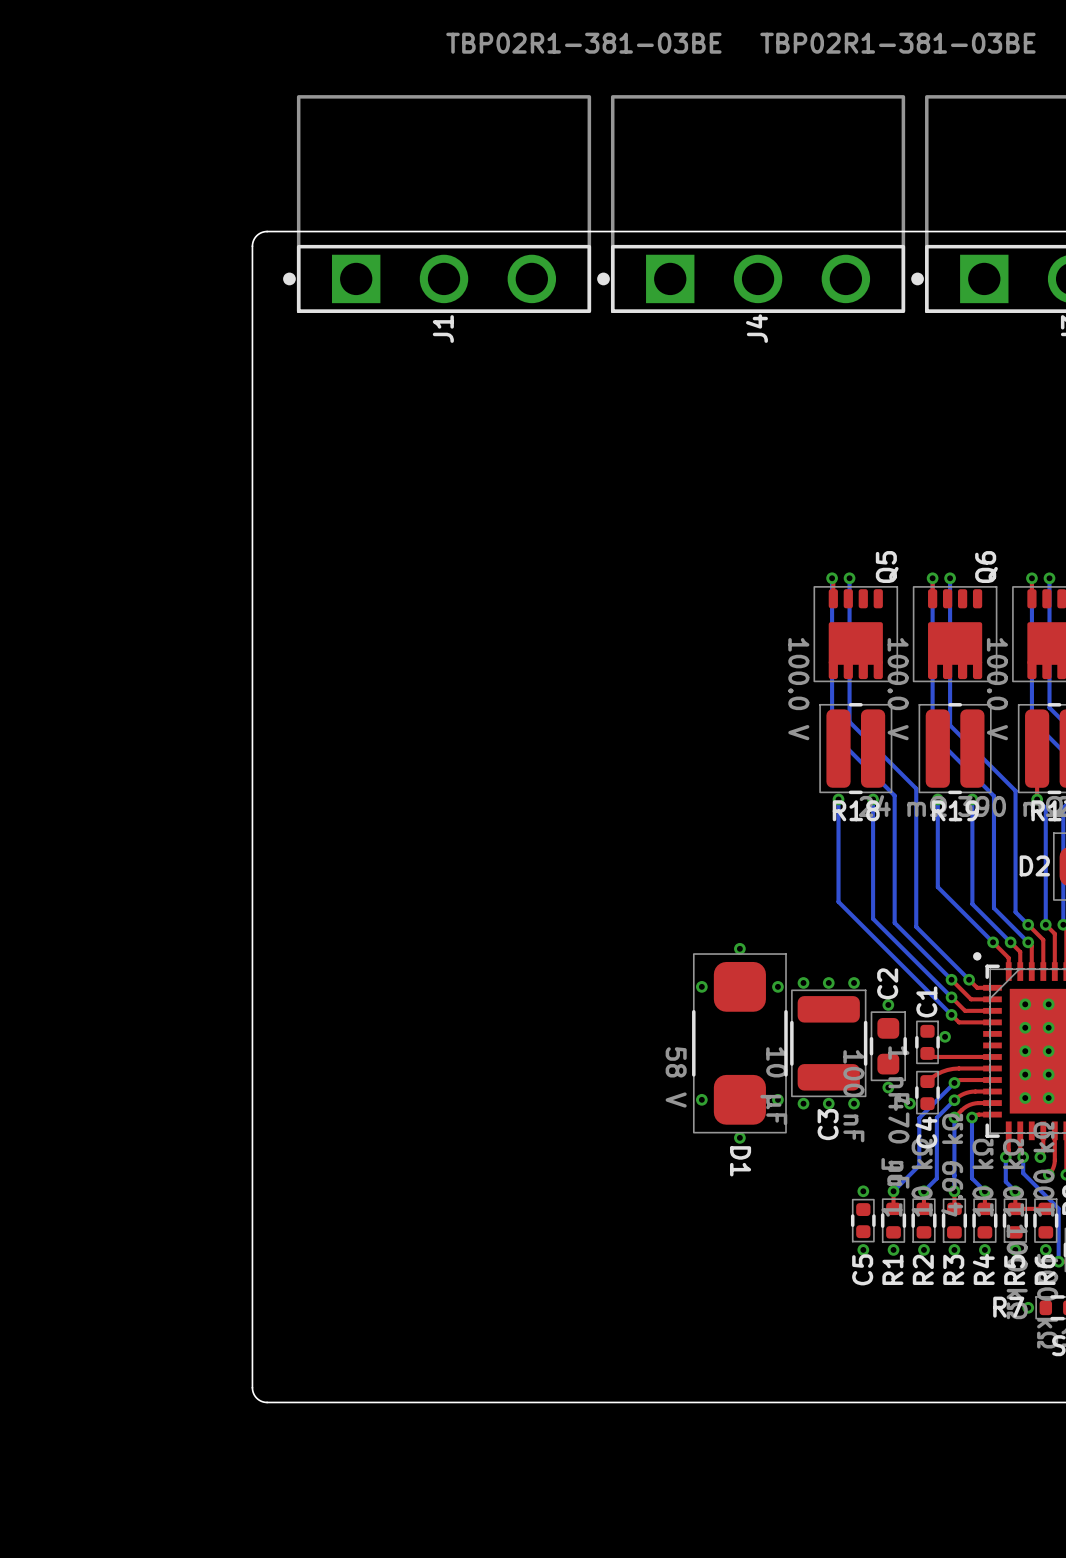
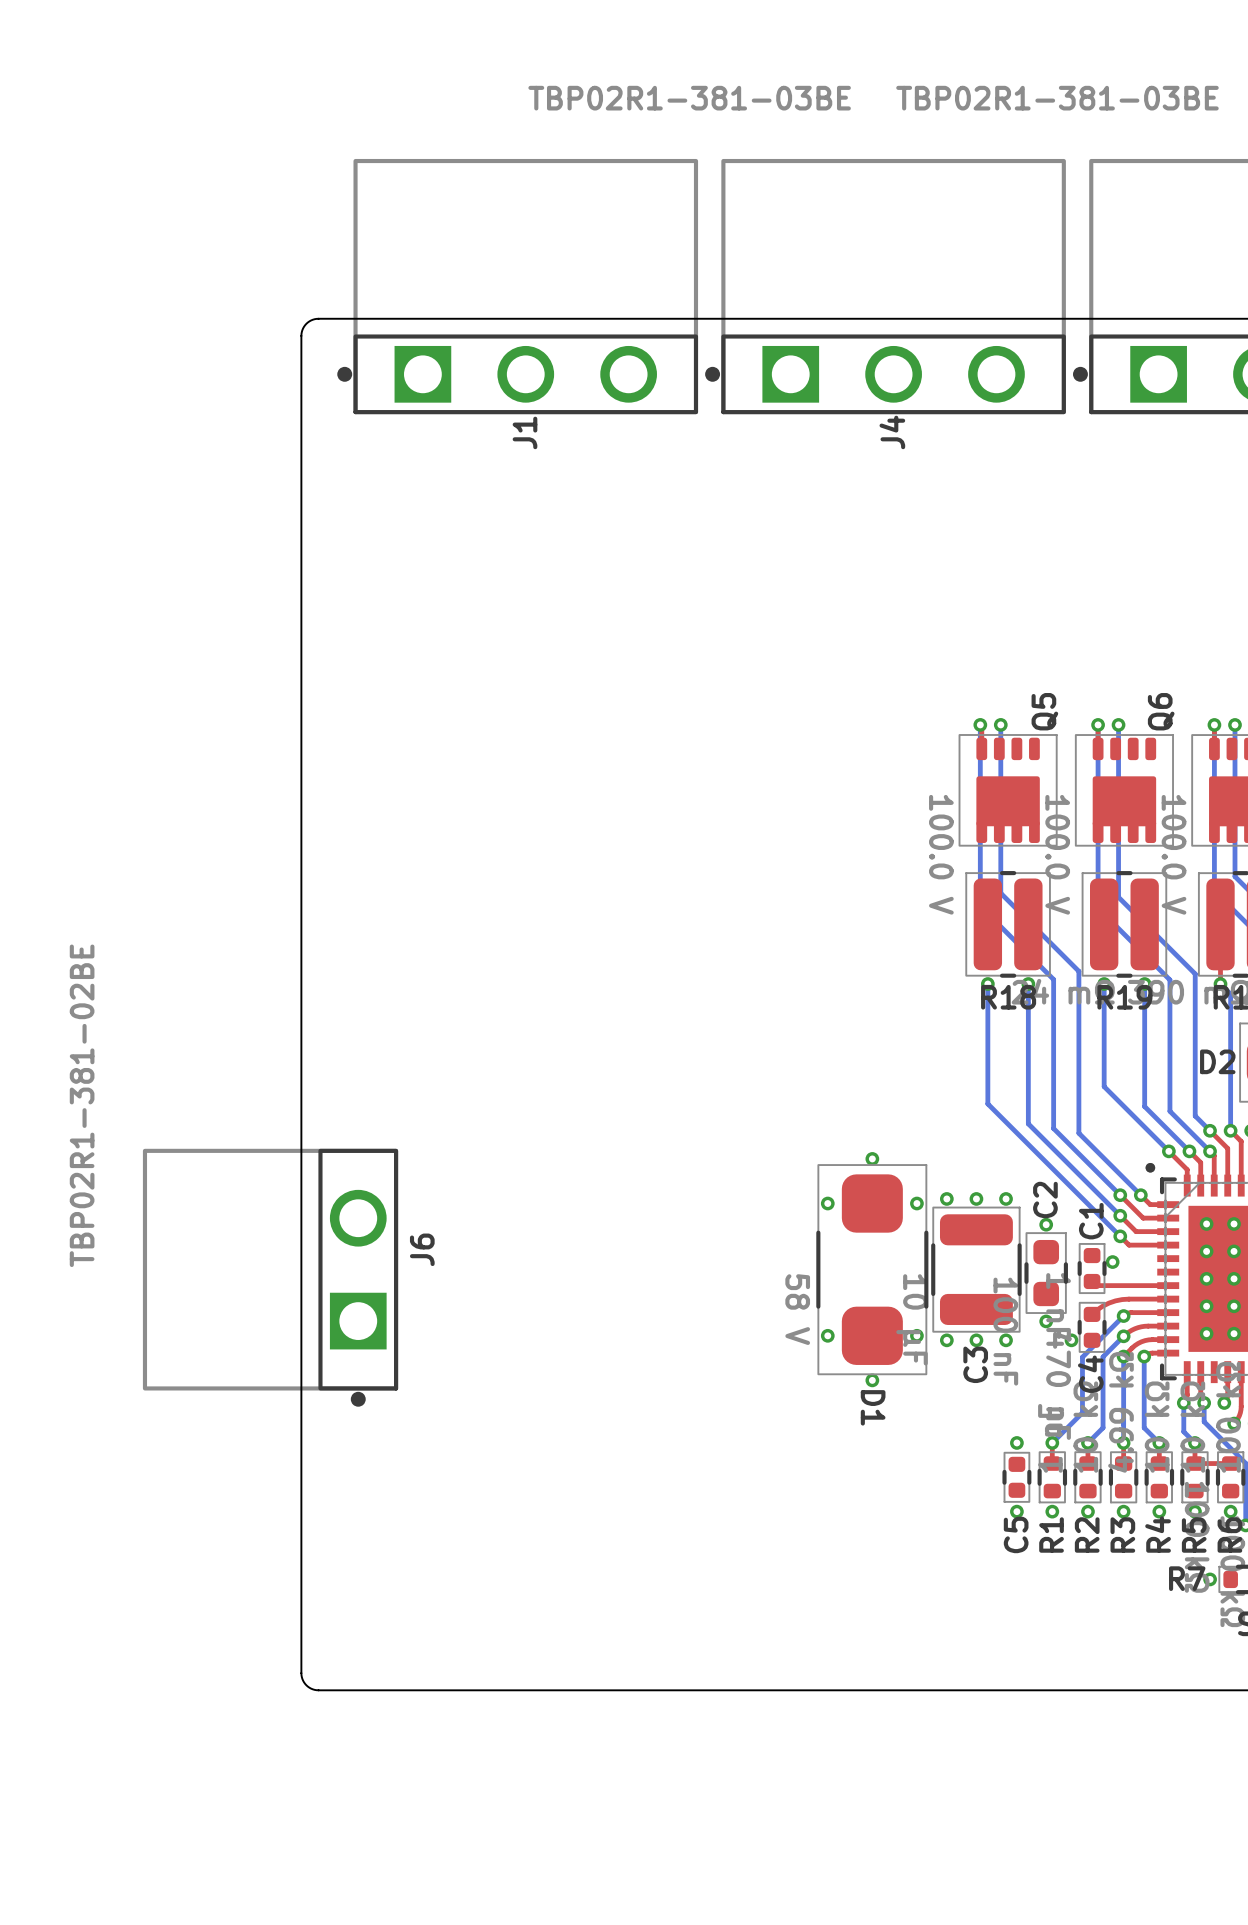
J6: none -> TBP02R1-381-02BE (270, 1277)

